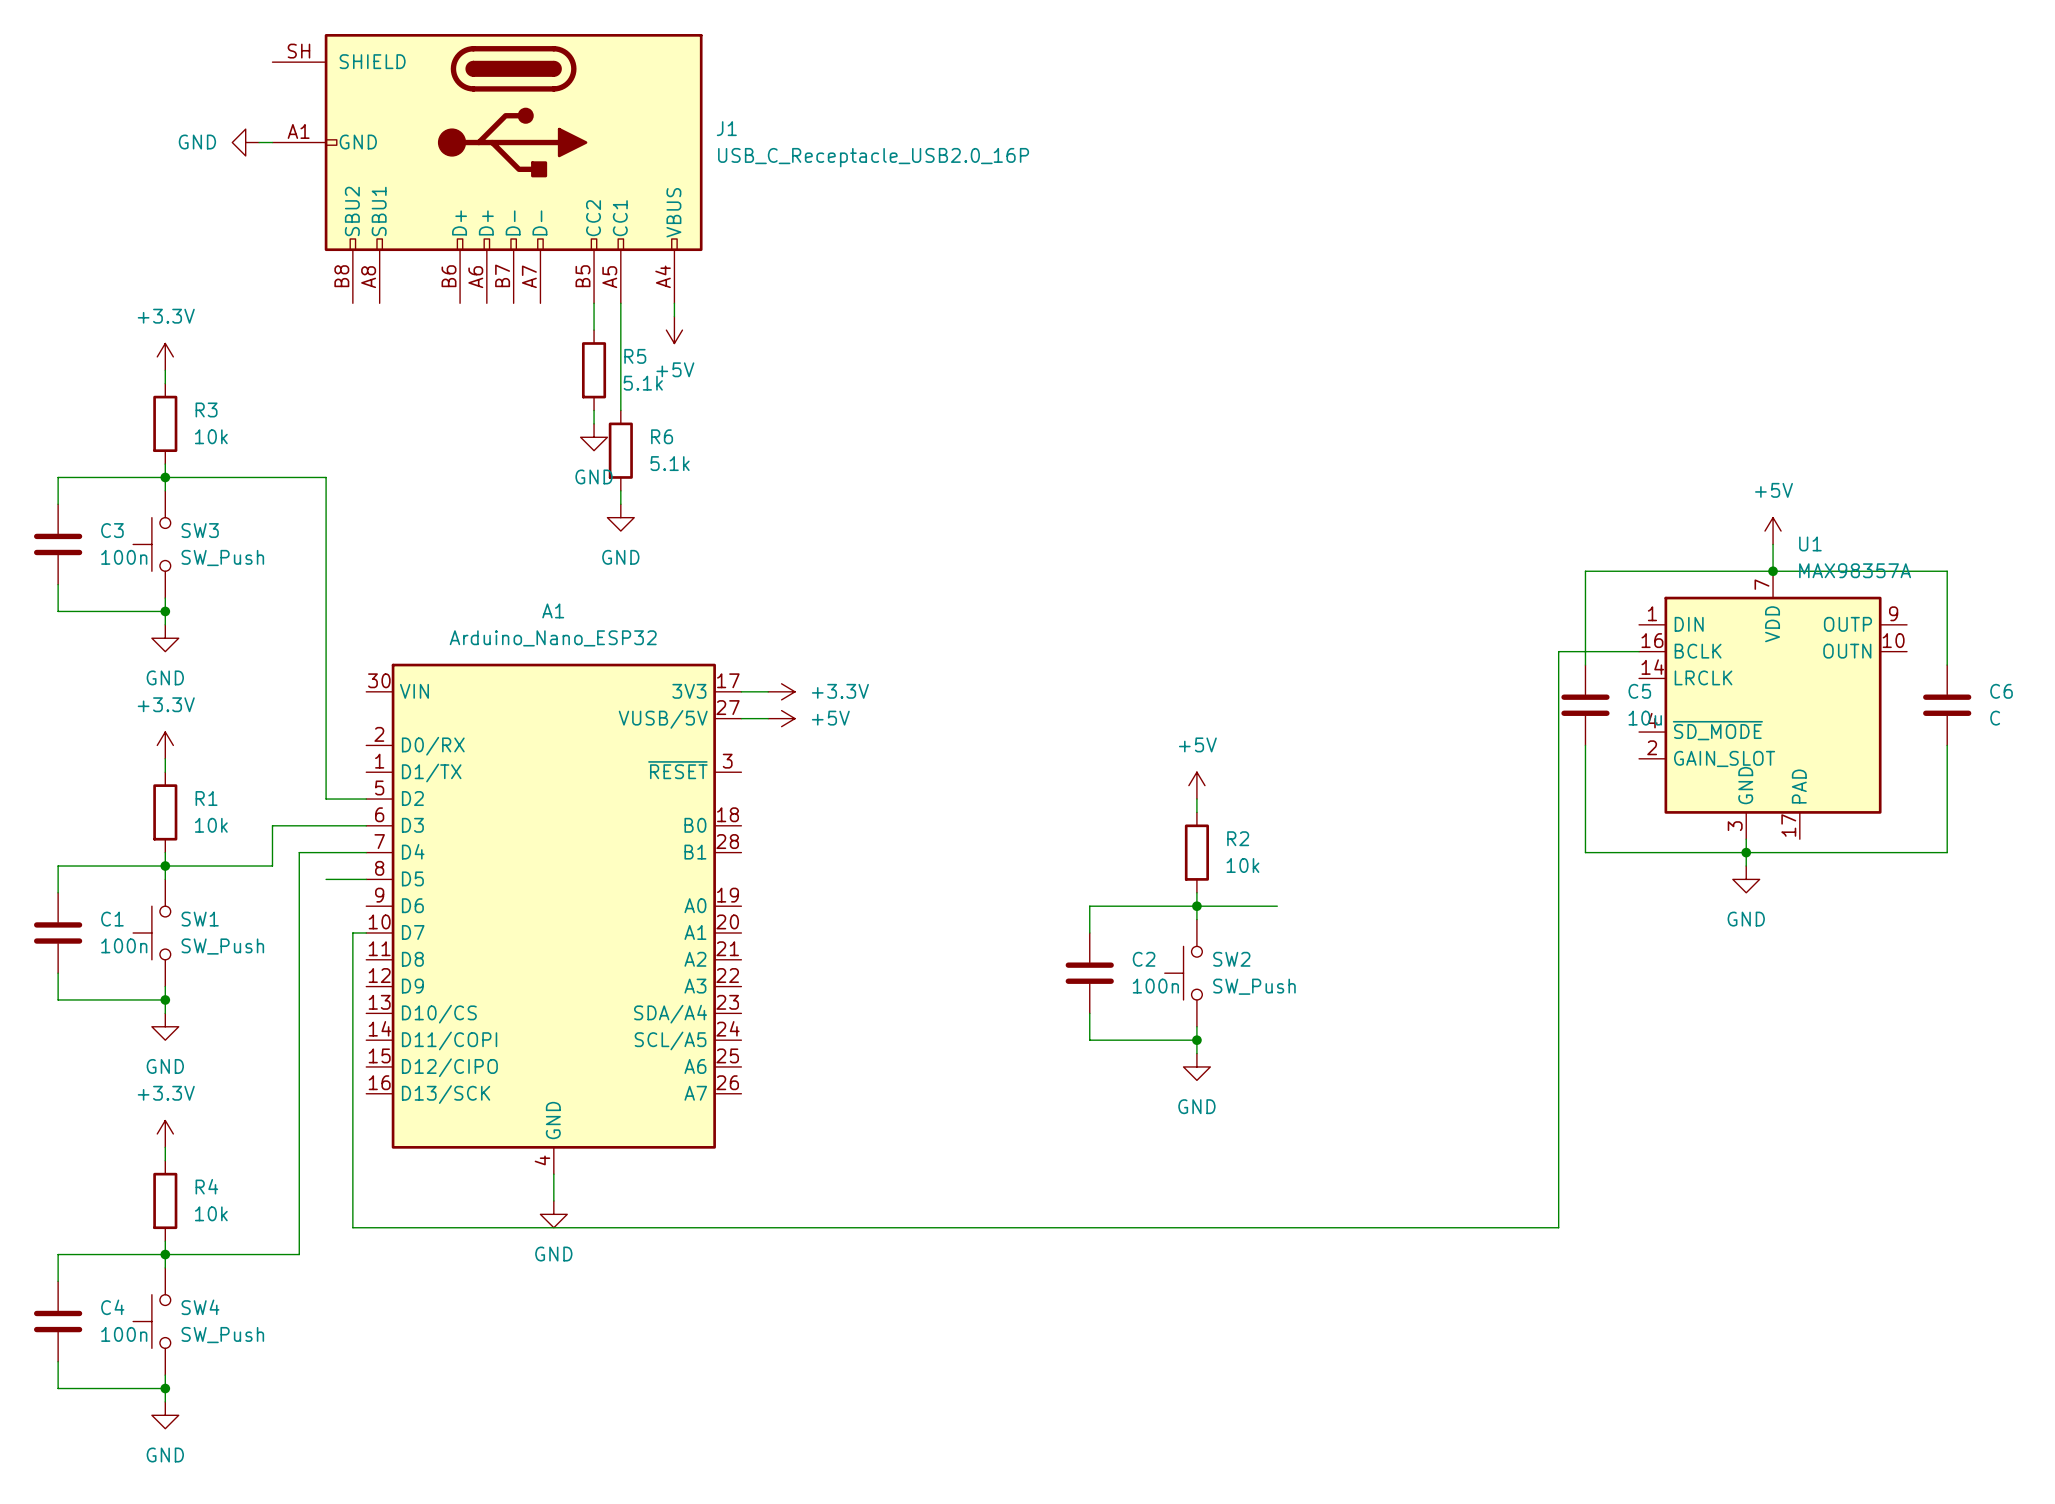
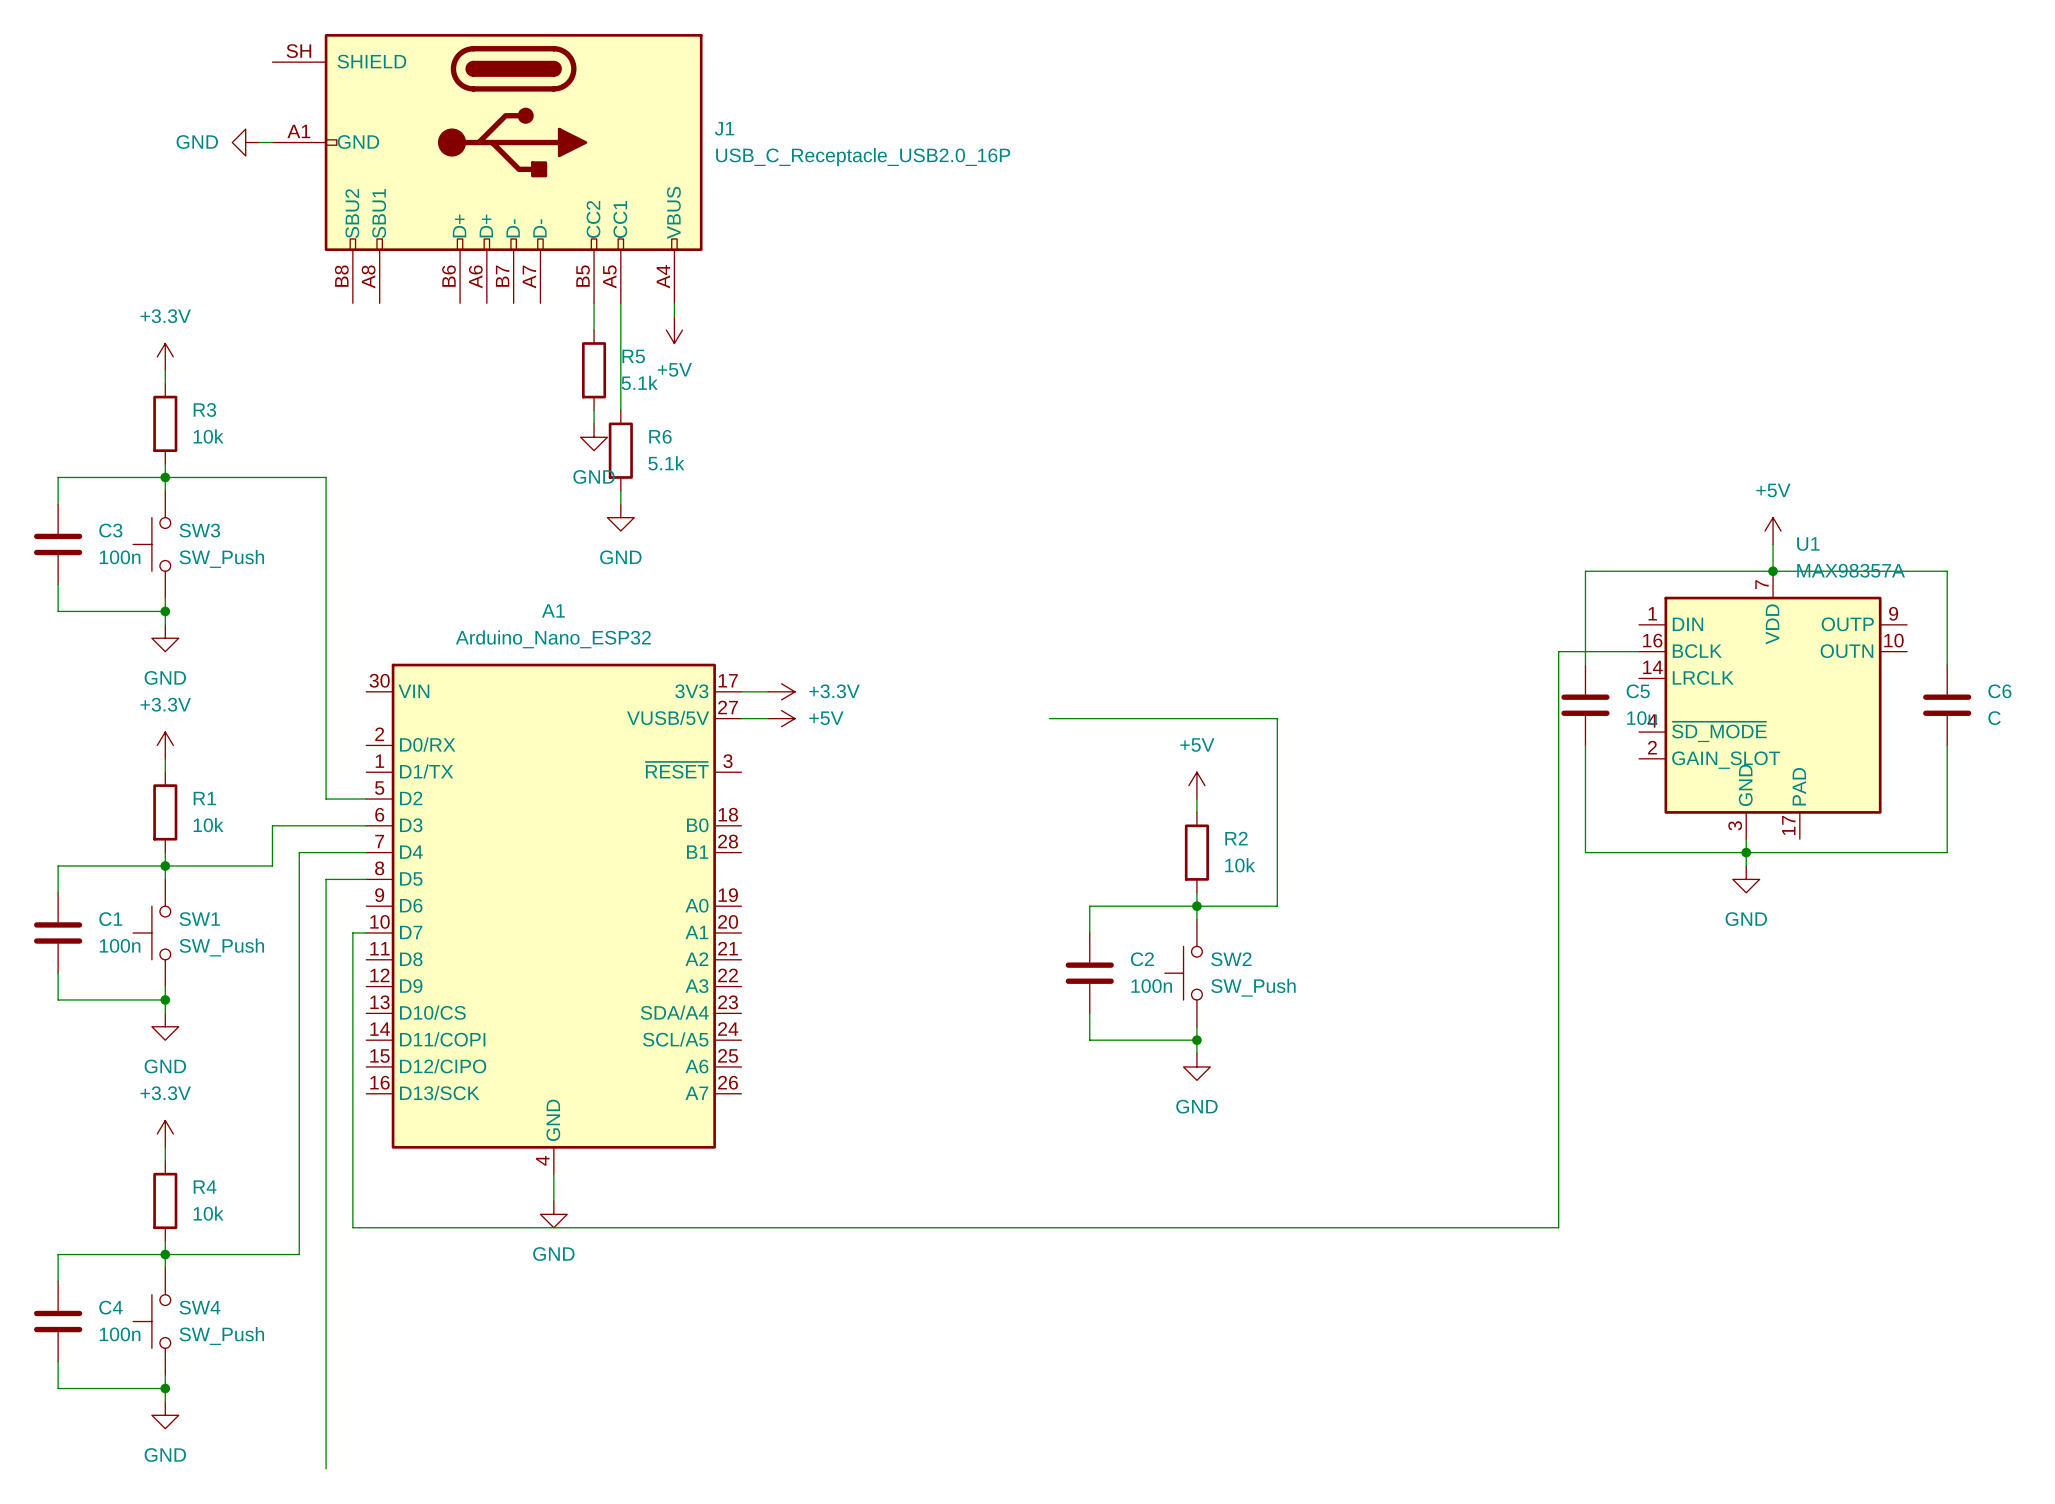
wire: none -> (1049, 718) (1277, 718) (1277, 906)
wire: none -> (326, 879) (326, 1468)

